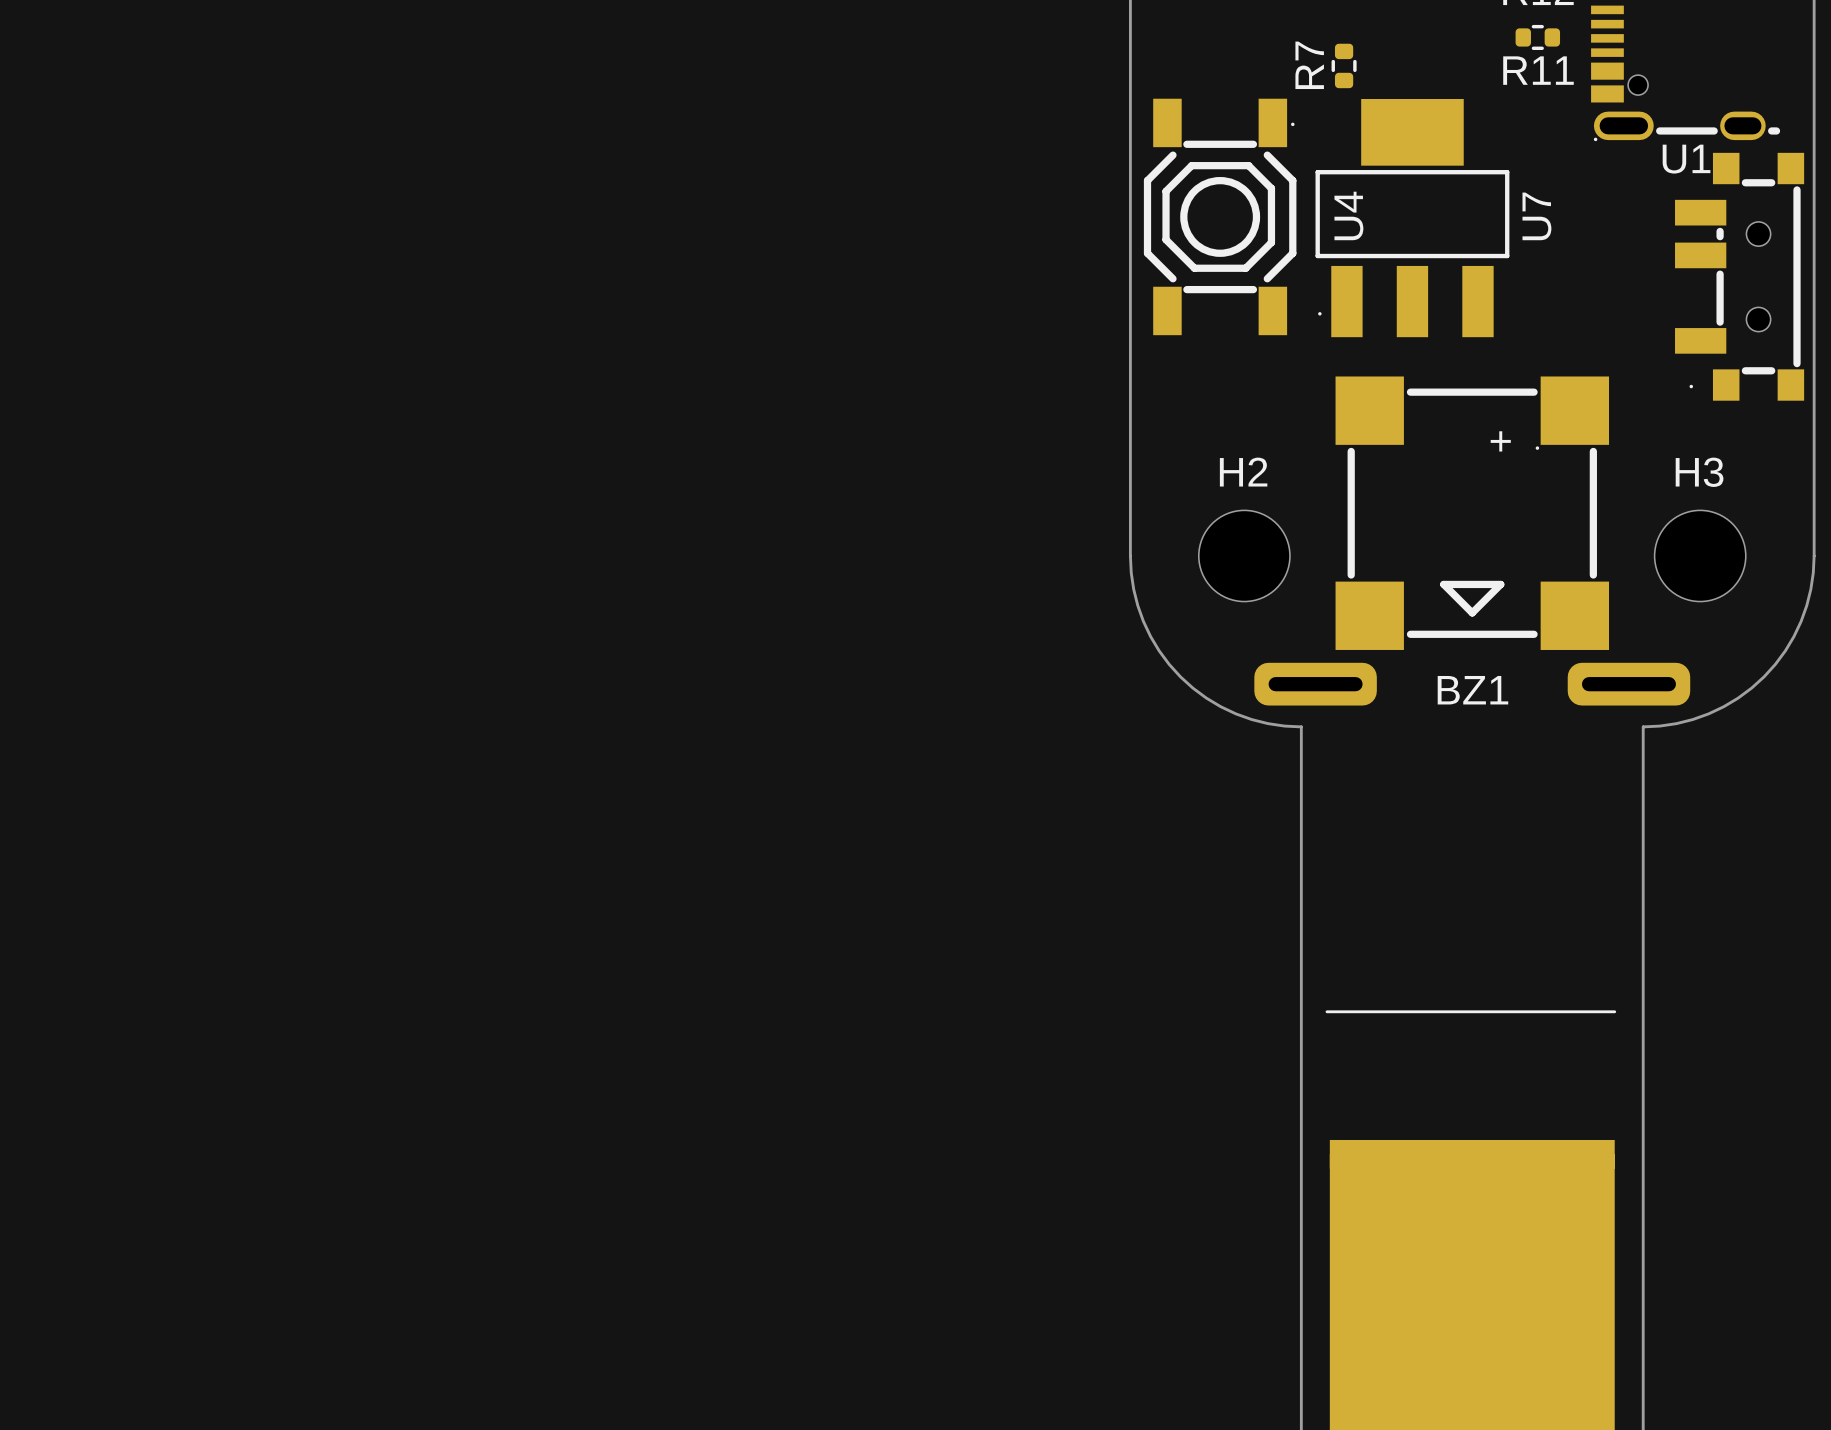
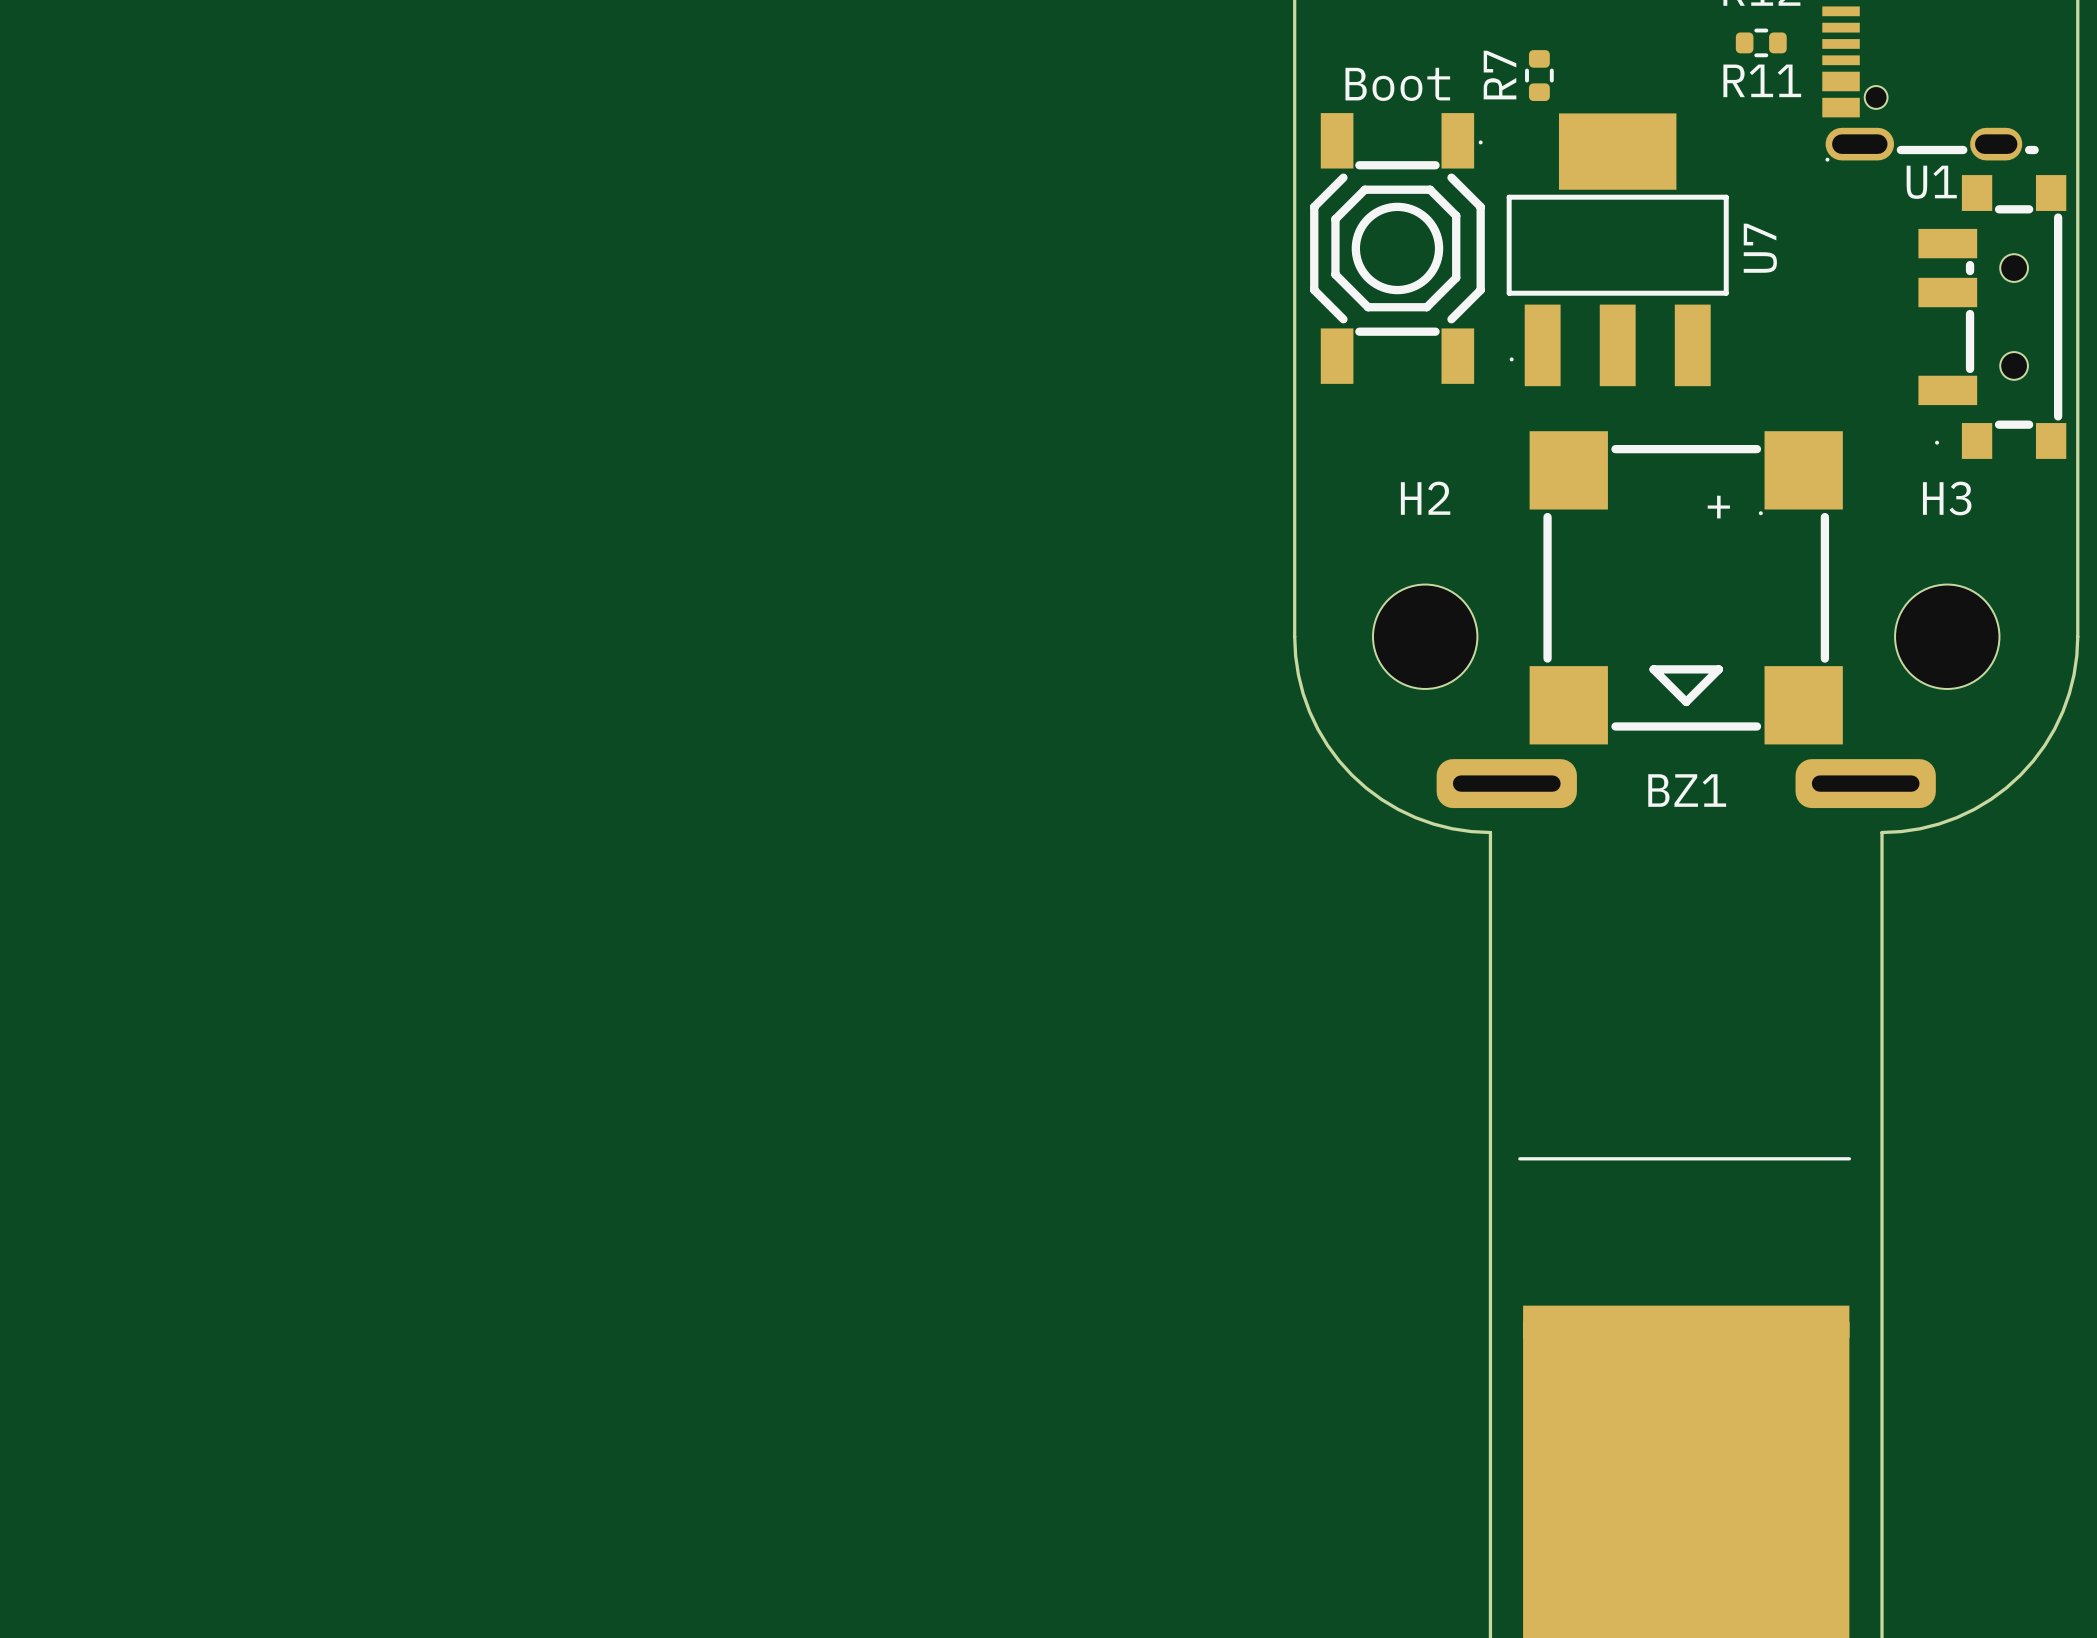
U4 name: U4 (1348, 215) -> Boot (1397, 84)
H2 name position: H2 (1243, 472) -> H2 (1425, 498)
H3 name position: H3 (1699, 472) -> H3 (1947, 498)

